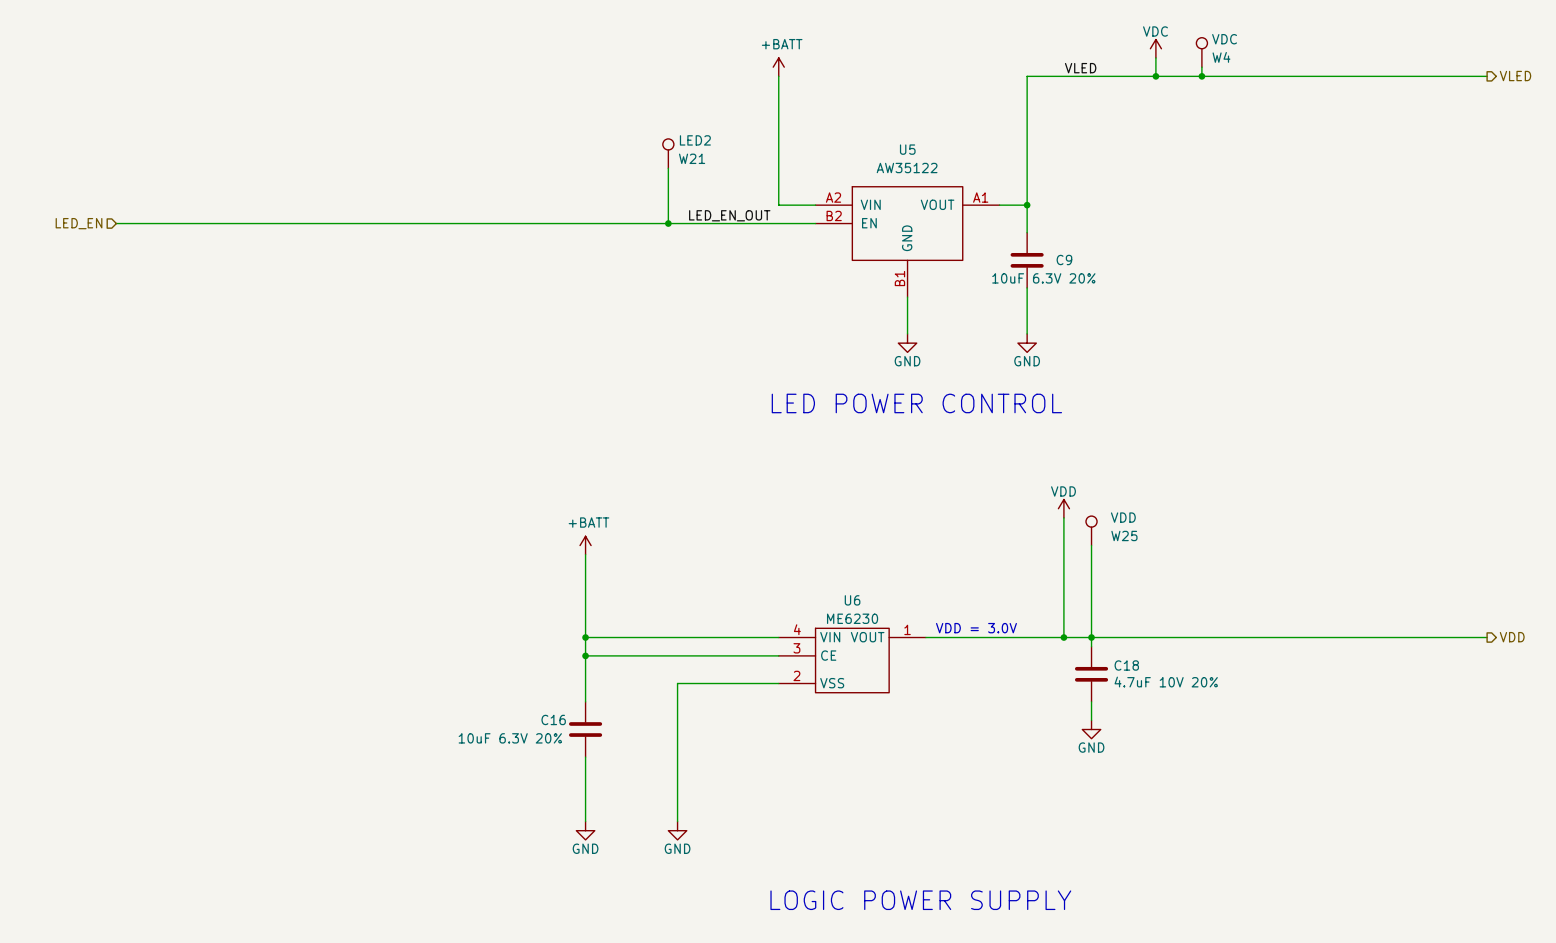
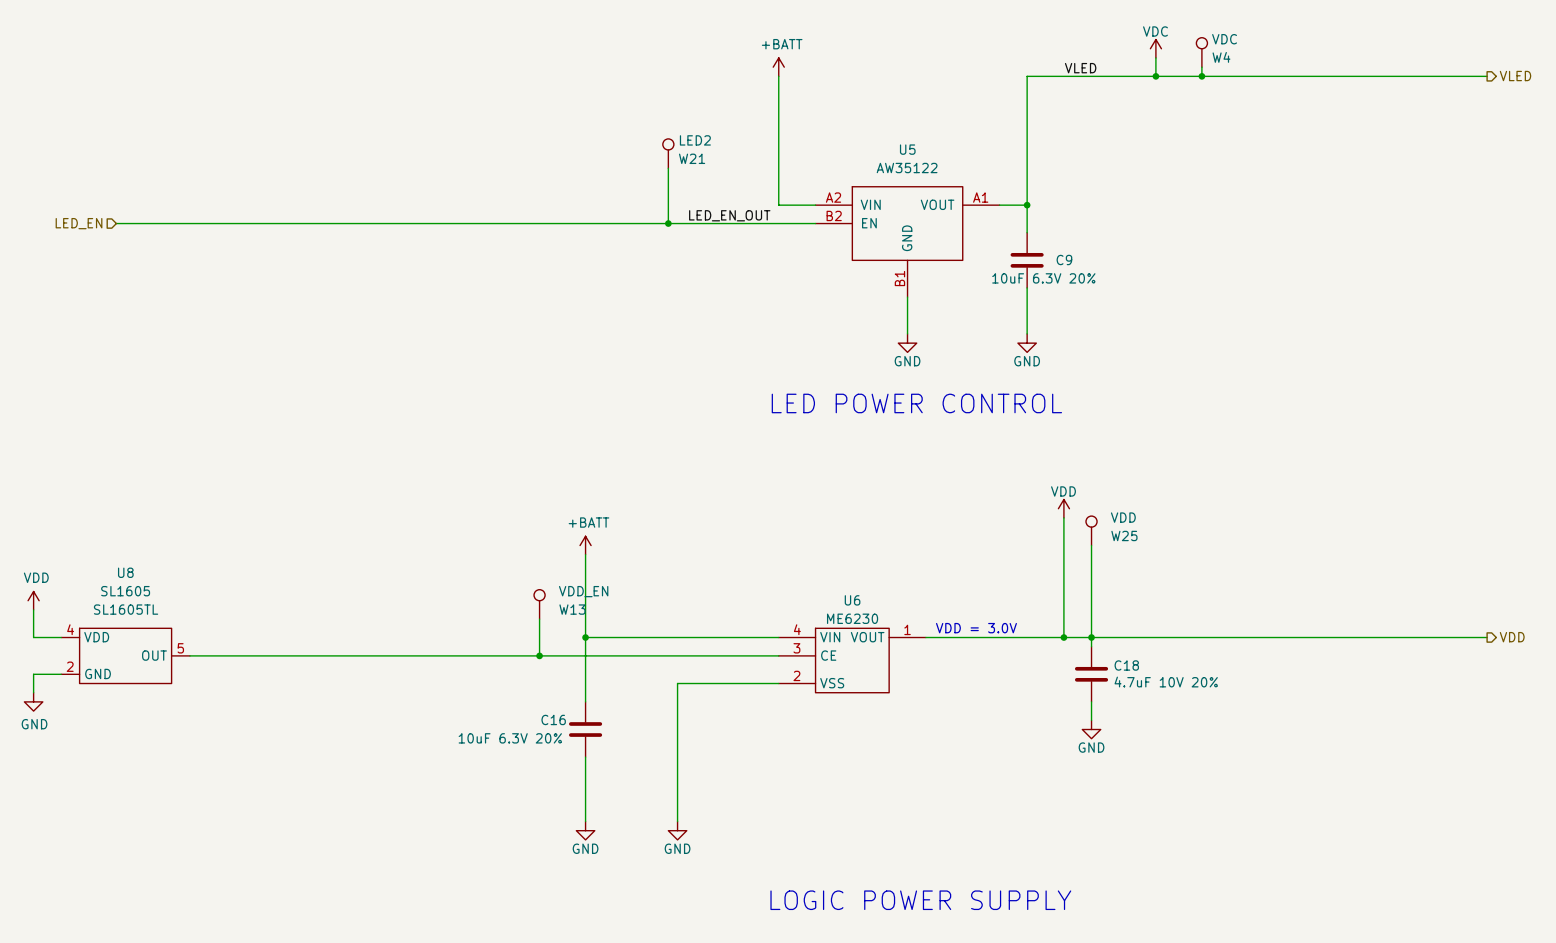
power symbol: none -> VDD (33, 600)
W13: none -> VDD_EN (539, 604)
wire: none -> (33, 609) (33, 637) (61, 637)
wire: none -> (539, 619) (539, 655)
U8: none -> SL1605 (125, 655)
wire: none -> (189, 655) (585, 655)
junction: none -> (539, 655)
junction: (585, 655) -> none
wire: none -> (61, 674) (33, 674) (33, 692)
power symbol: none -> GND (33, 701)

